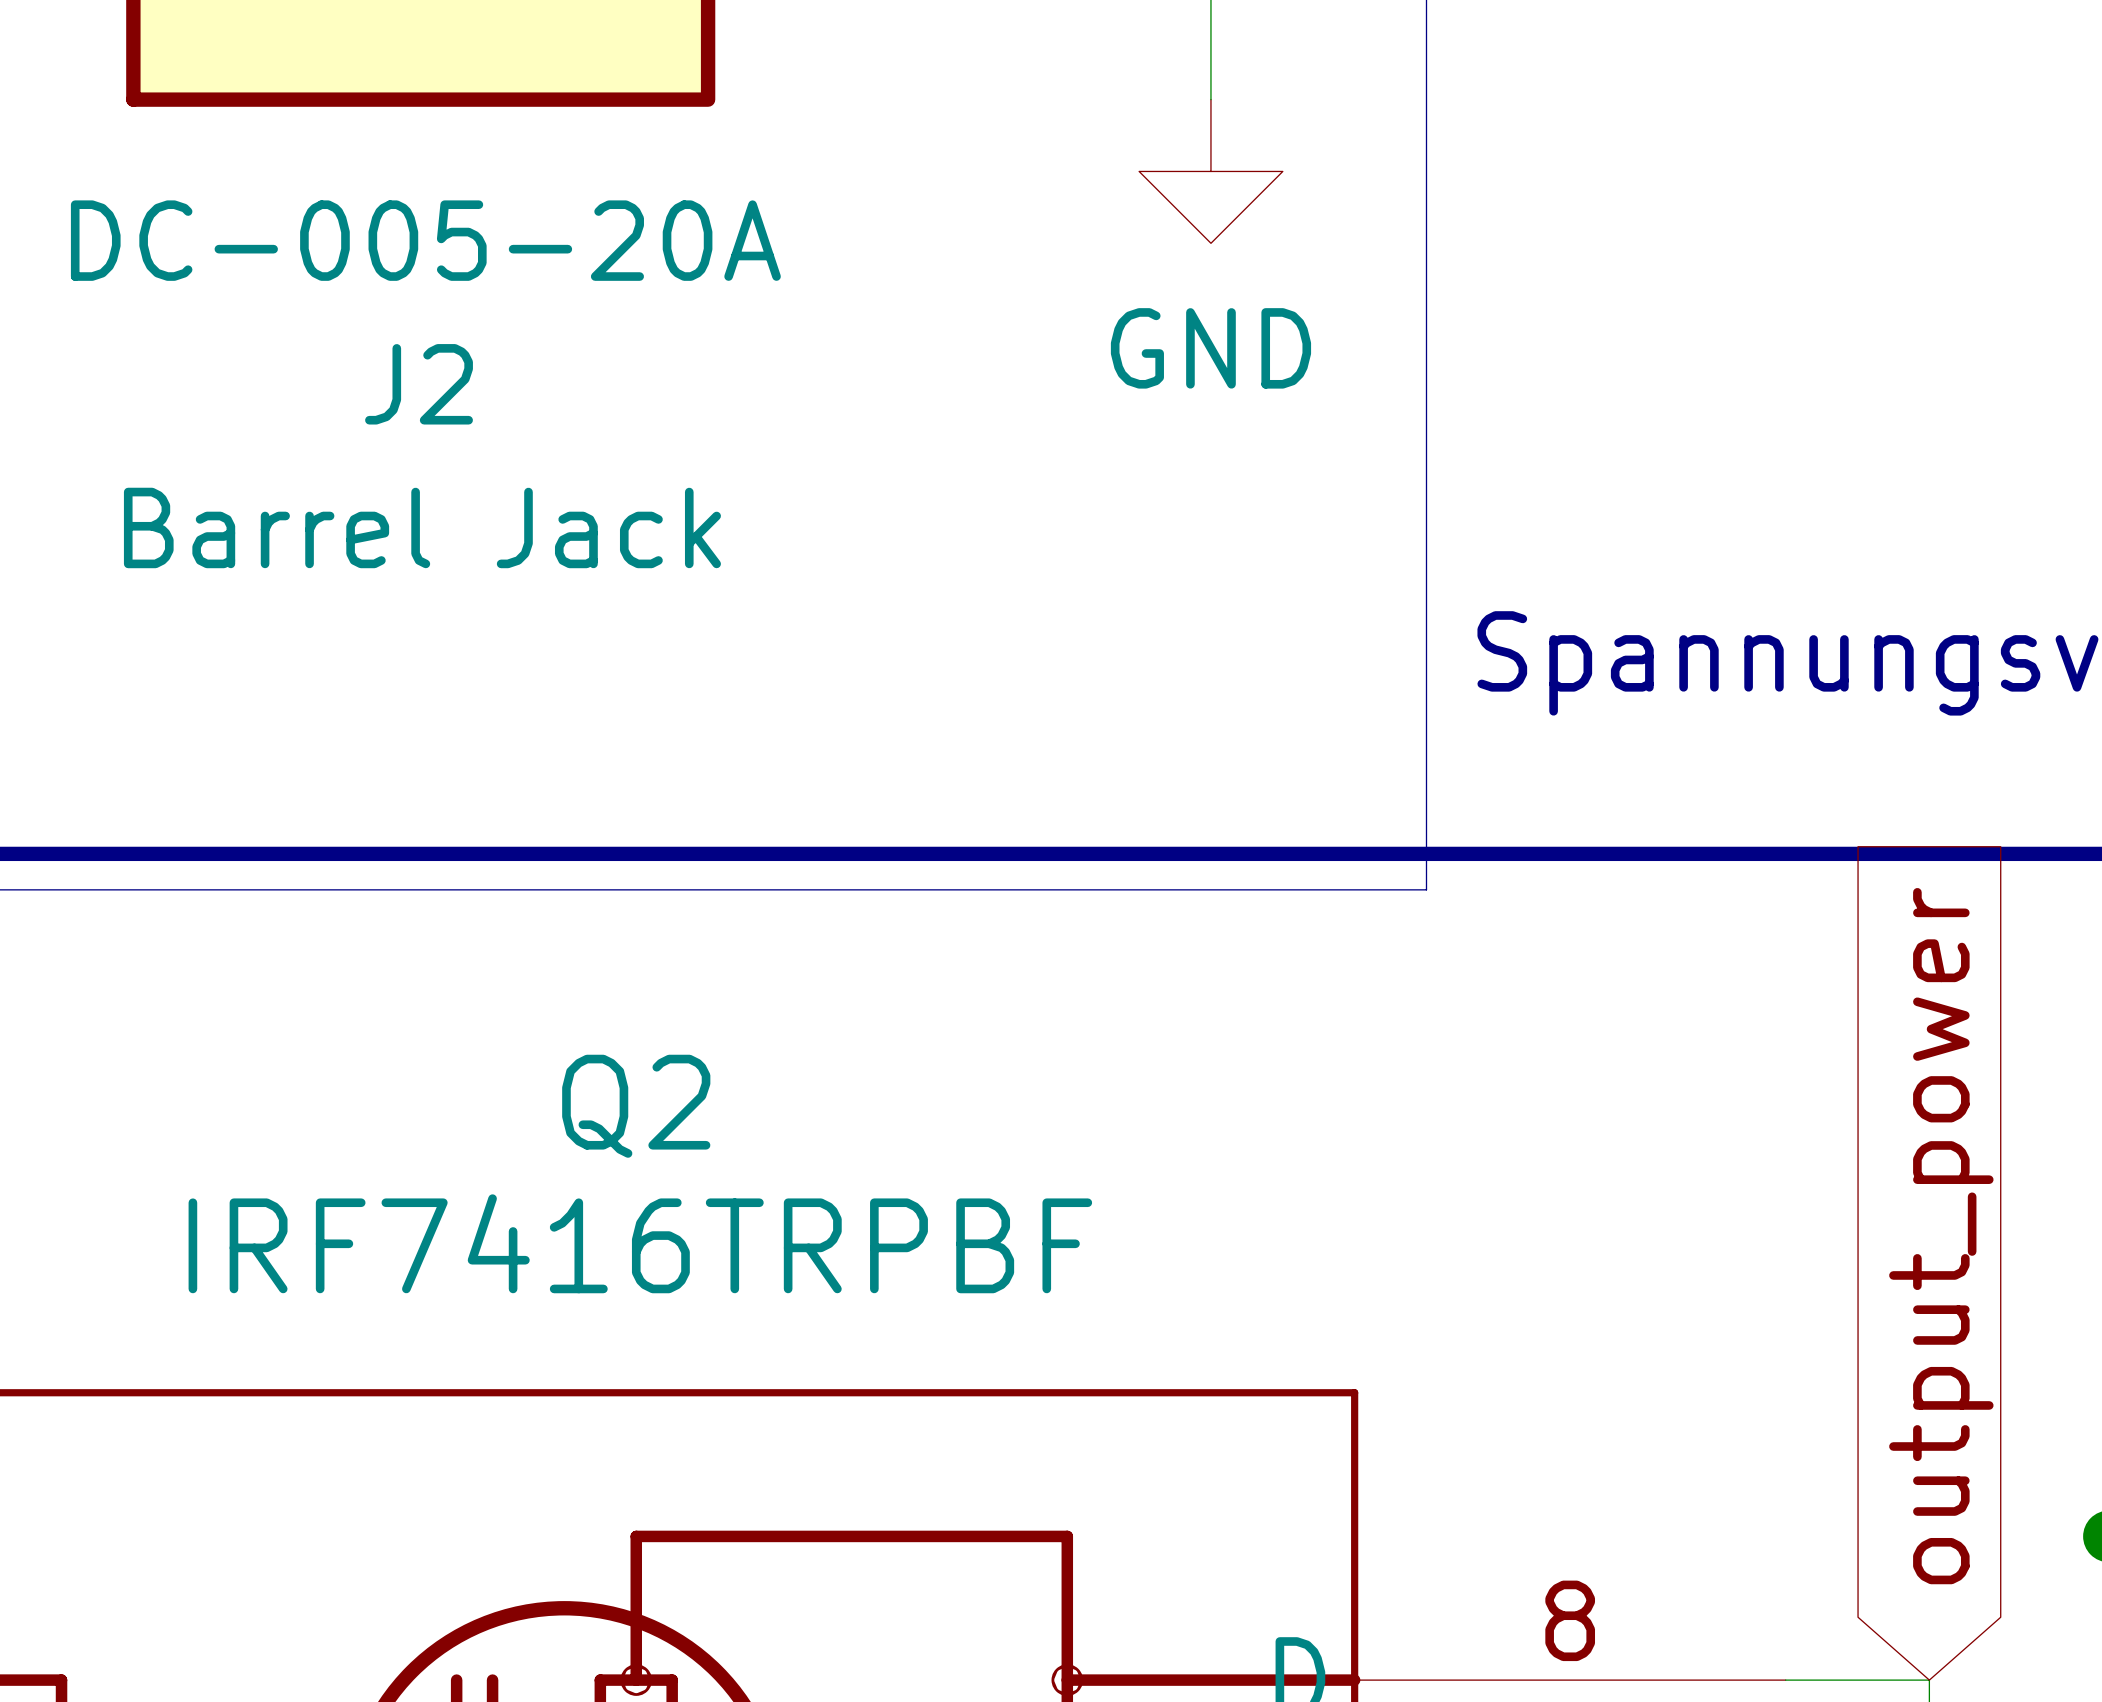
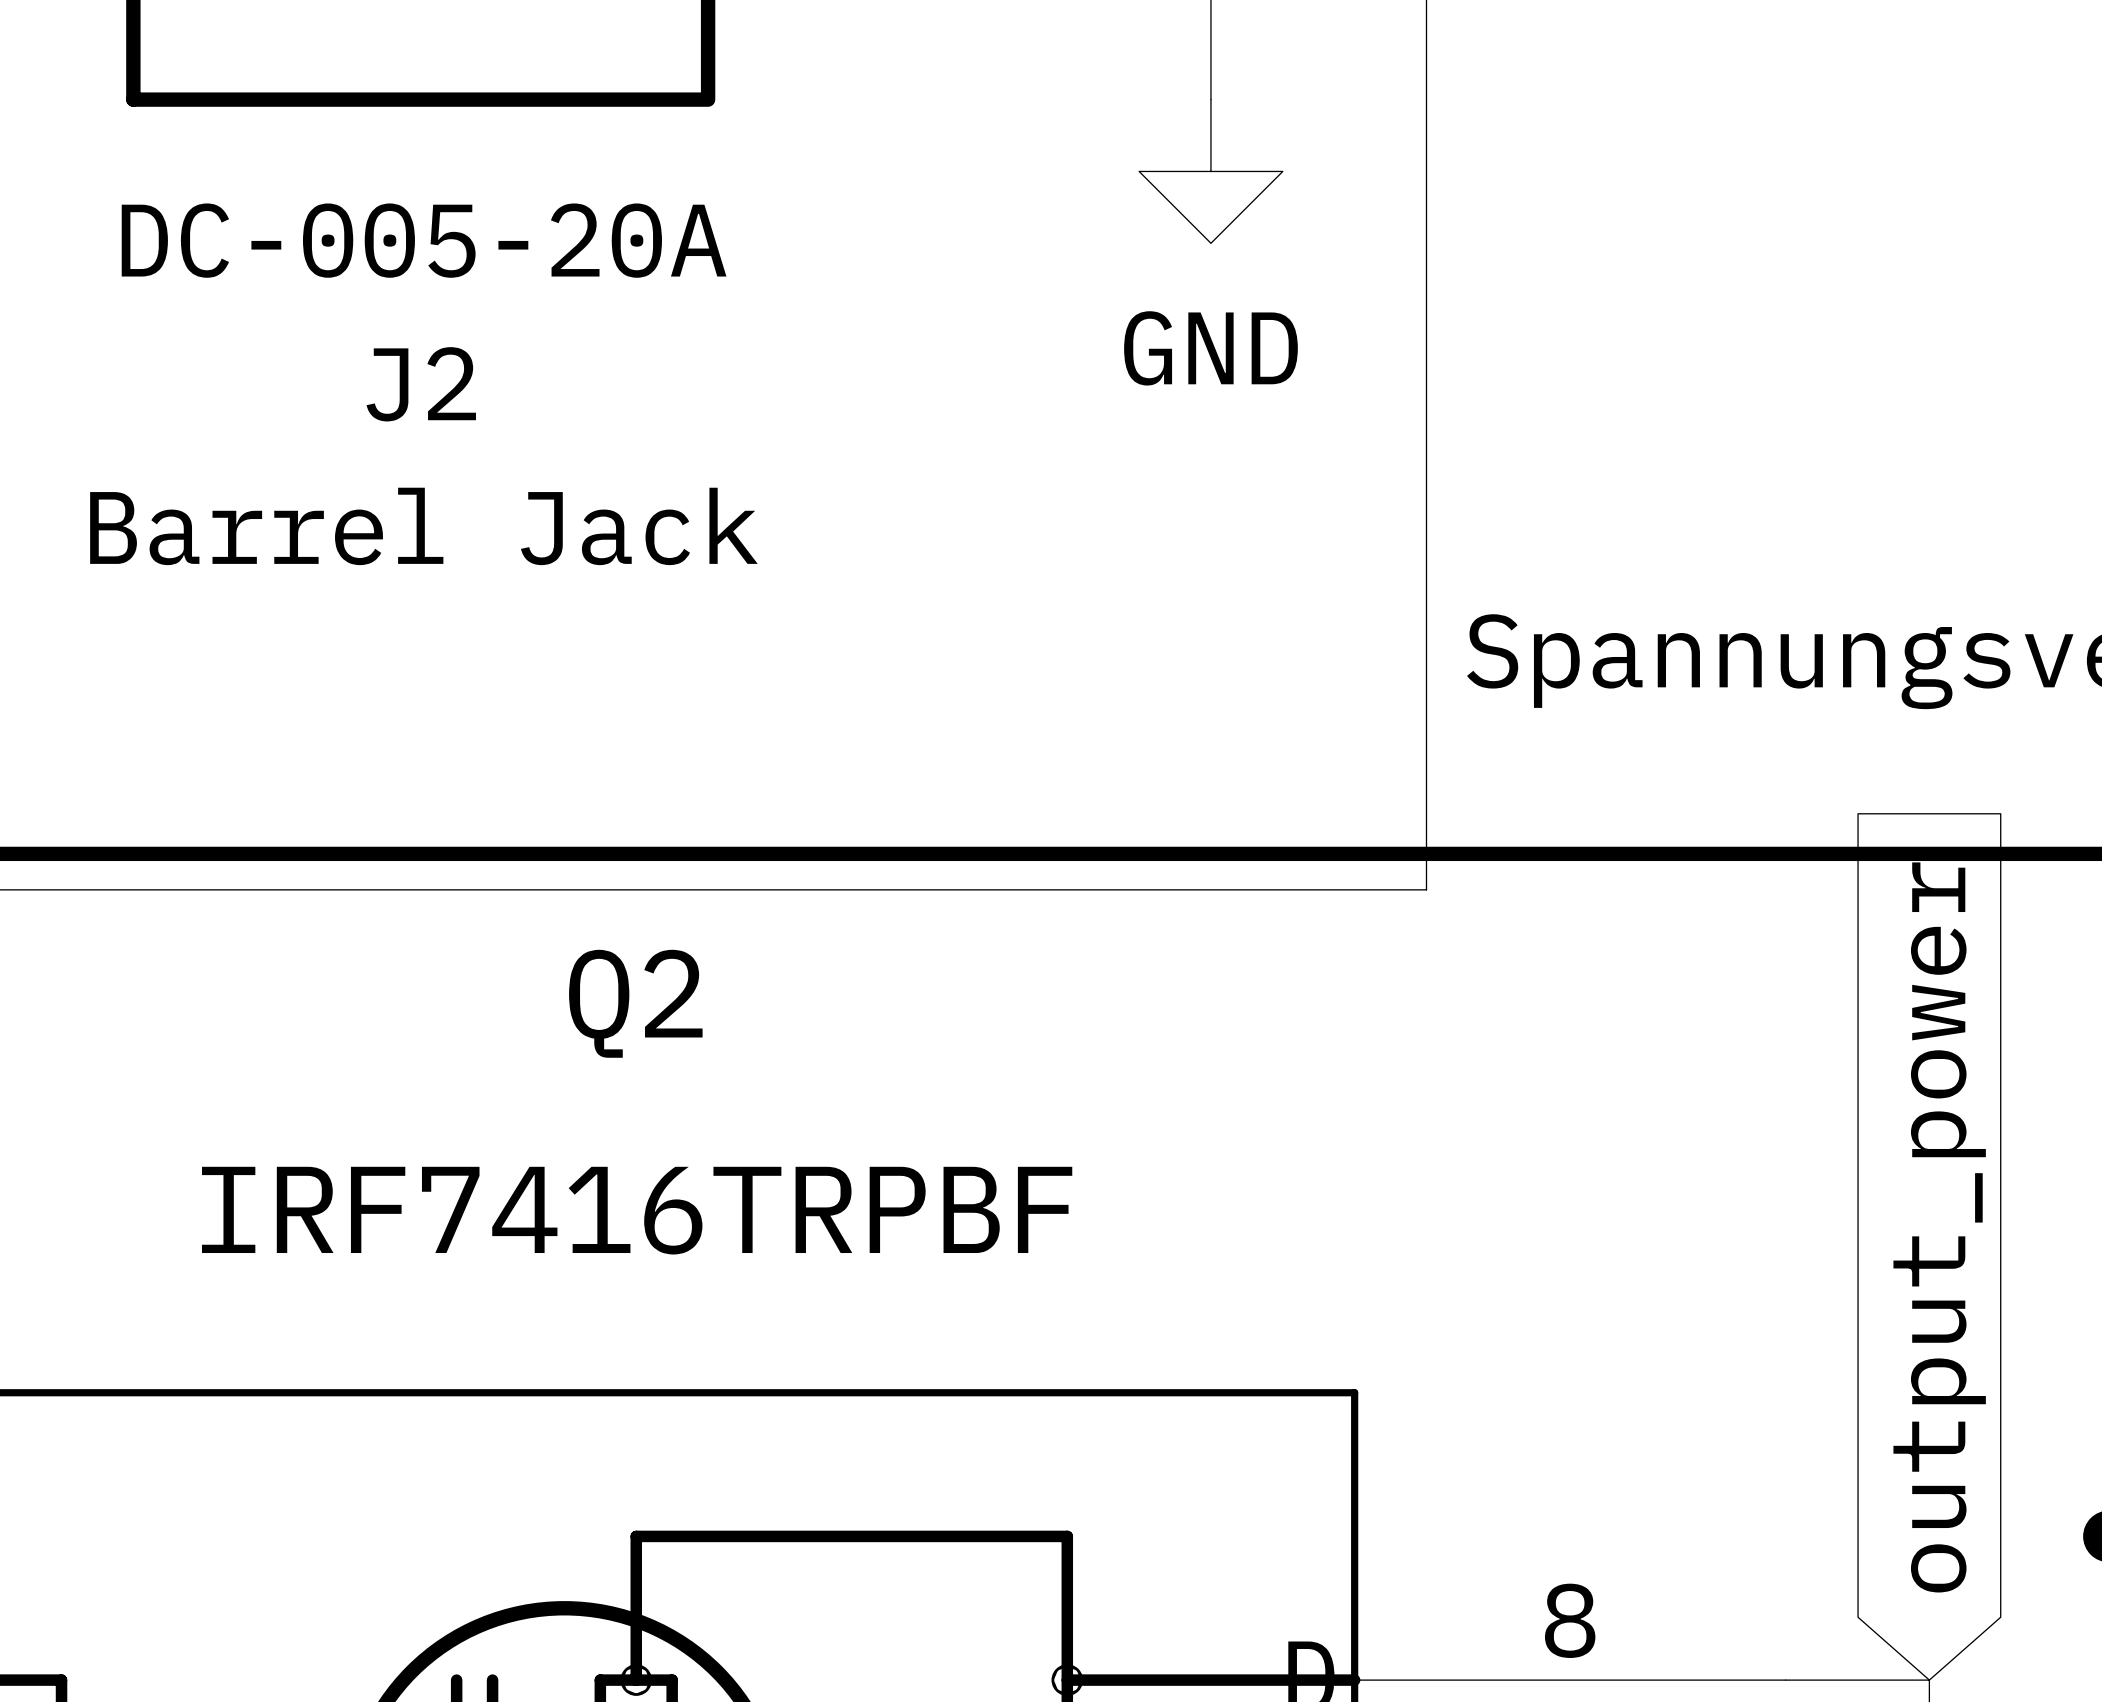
Q2 name position: Q2 (636, 1106) -> Q2 (635, 1003)
Q2 value position: IRF7416TRPBF (640, 1243) -> IRF7416TRPBF (637, 1210)

